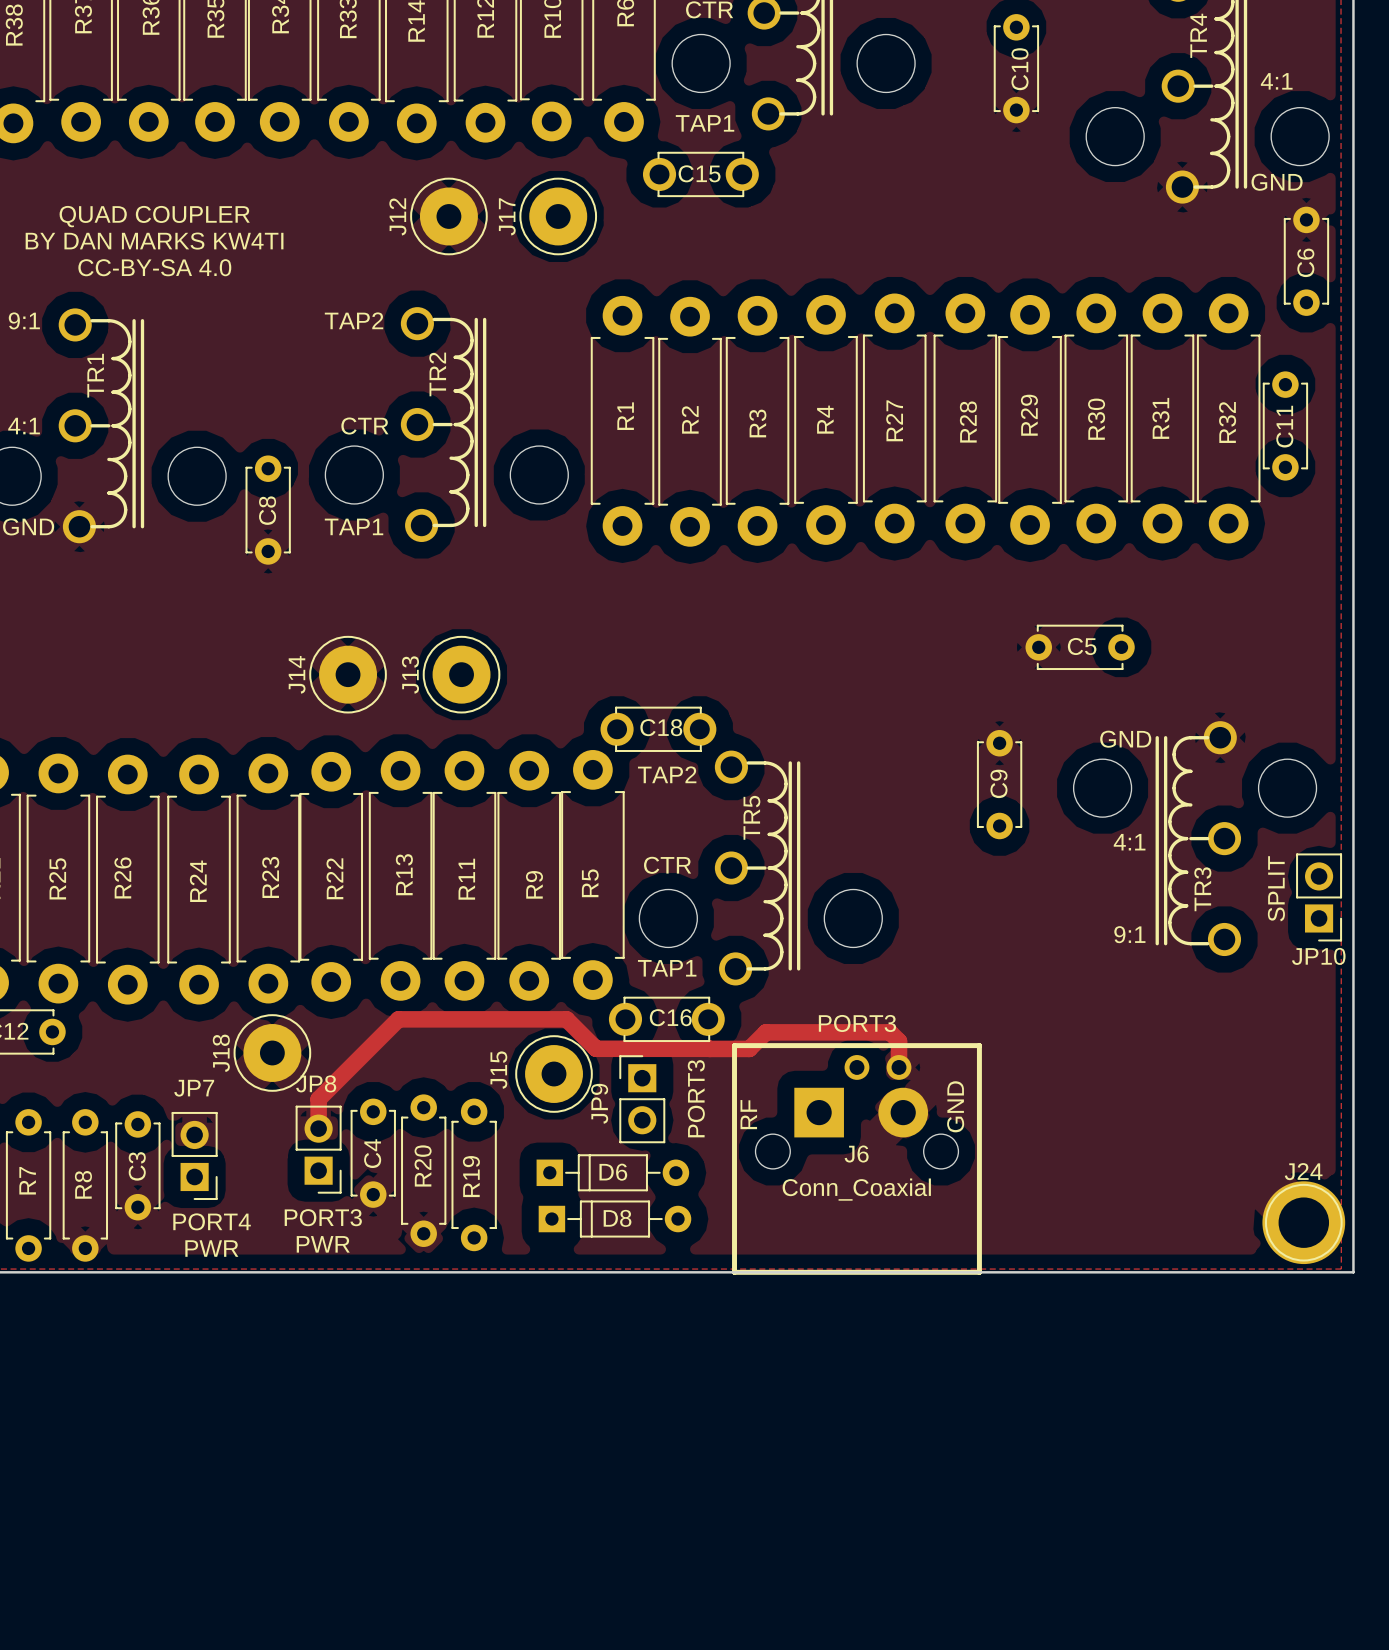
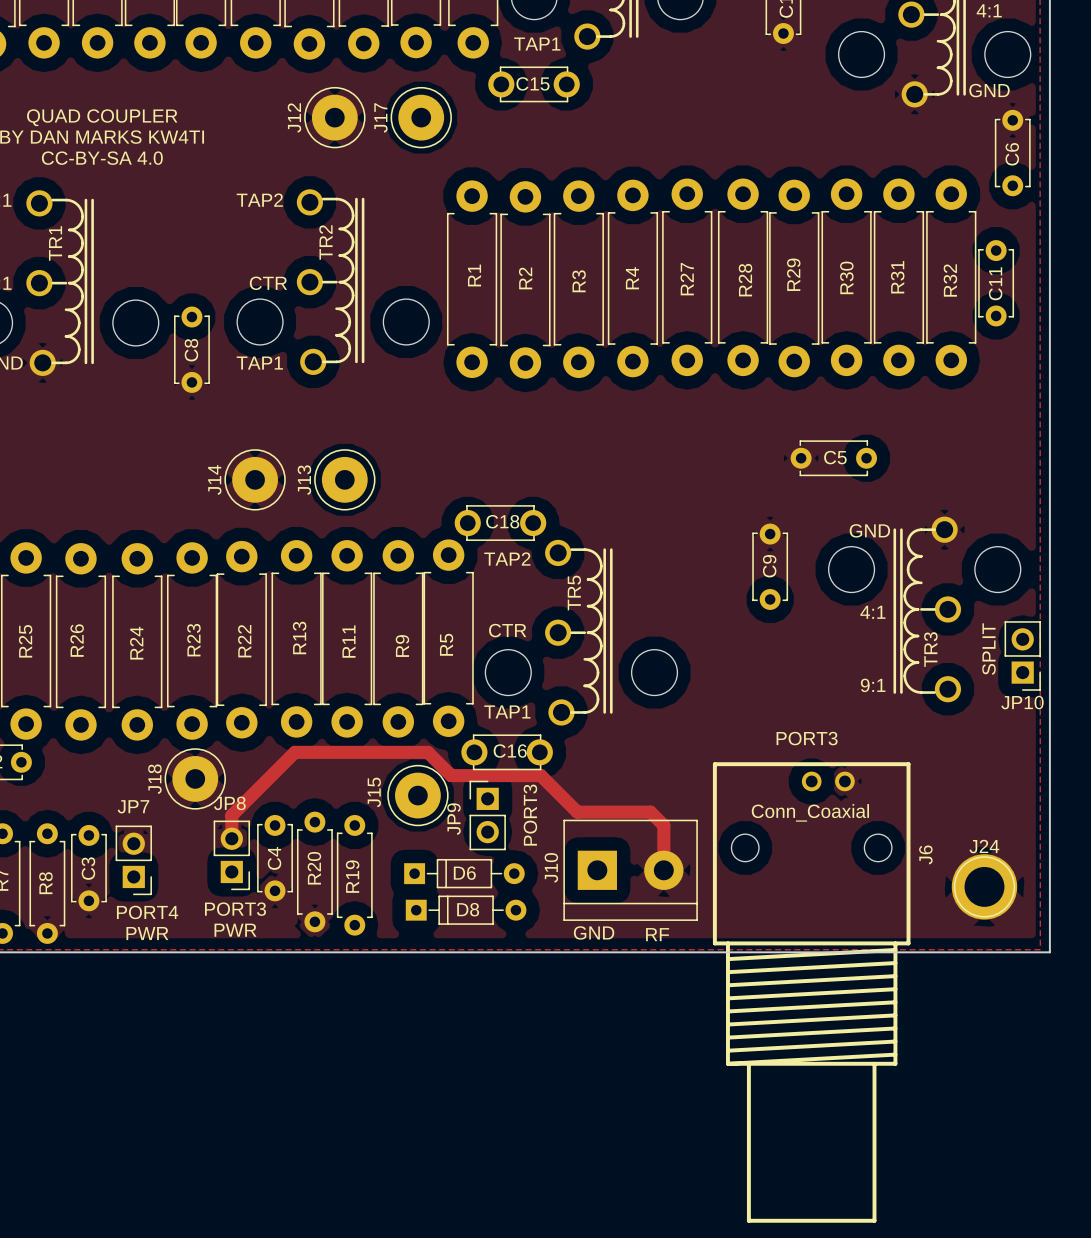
text position: PORT3 (857, 1023) -> PORT3 (807, 738)
J6 footprint: [732, 1043, 982, 1275] -> [712, 762, 911, 1223]
track: (709, 1048) (749, 1048) (765, 1032) (890, 1032) (899, 1041) (899, 1067) -> (540, 775) (577, 812) (650, 812) (663, 825) (663, 870)
text rotation: 0° (955, 1106) -> 90° clockwise (594, 932)
text position: GND (955, 1106) -> GND (594, 932)
text rotation: 0° (748, 1114) -> 90° clockwise (657, 934)
text position: RF (748, 1114) -> RF (657, 934)
J6 name position: J6 (856, 1154) -> J6 (925, 854)
J10: none -> (630, 870)
J6 value position: Conn_Coaxial (856, 1189) -> Conn_Coaxial (810, 812)
J24 position: (1303, 1222) -> (984, 886)

